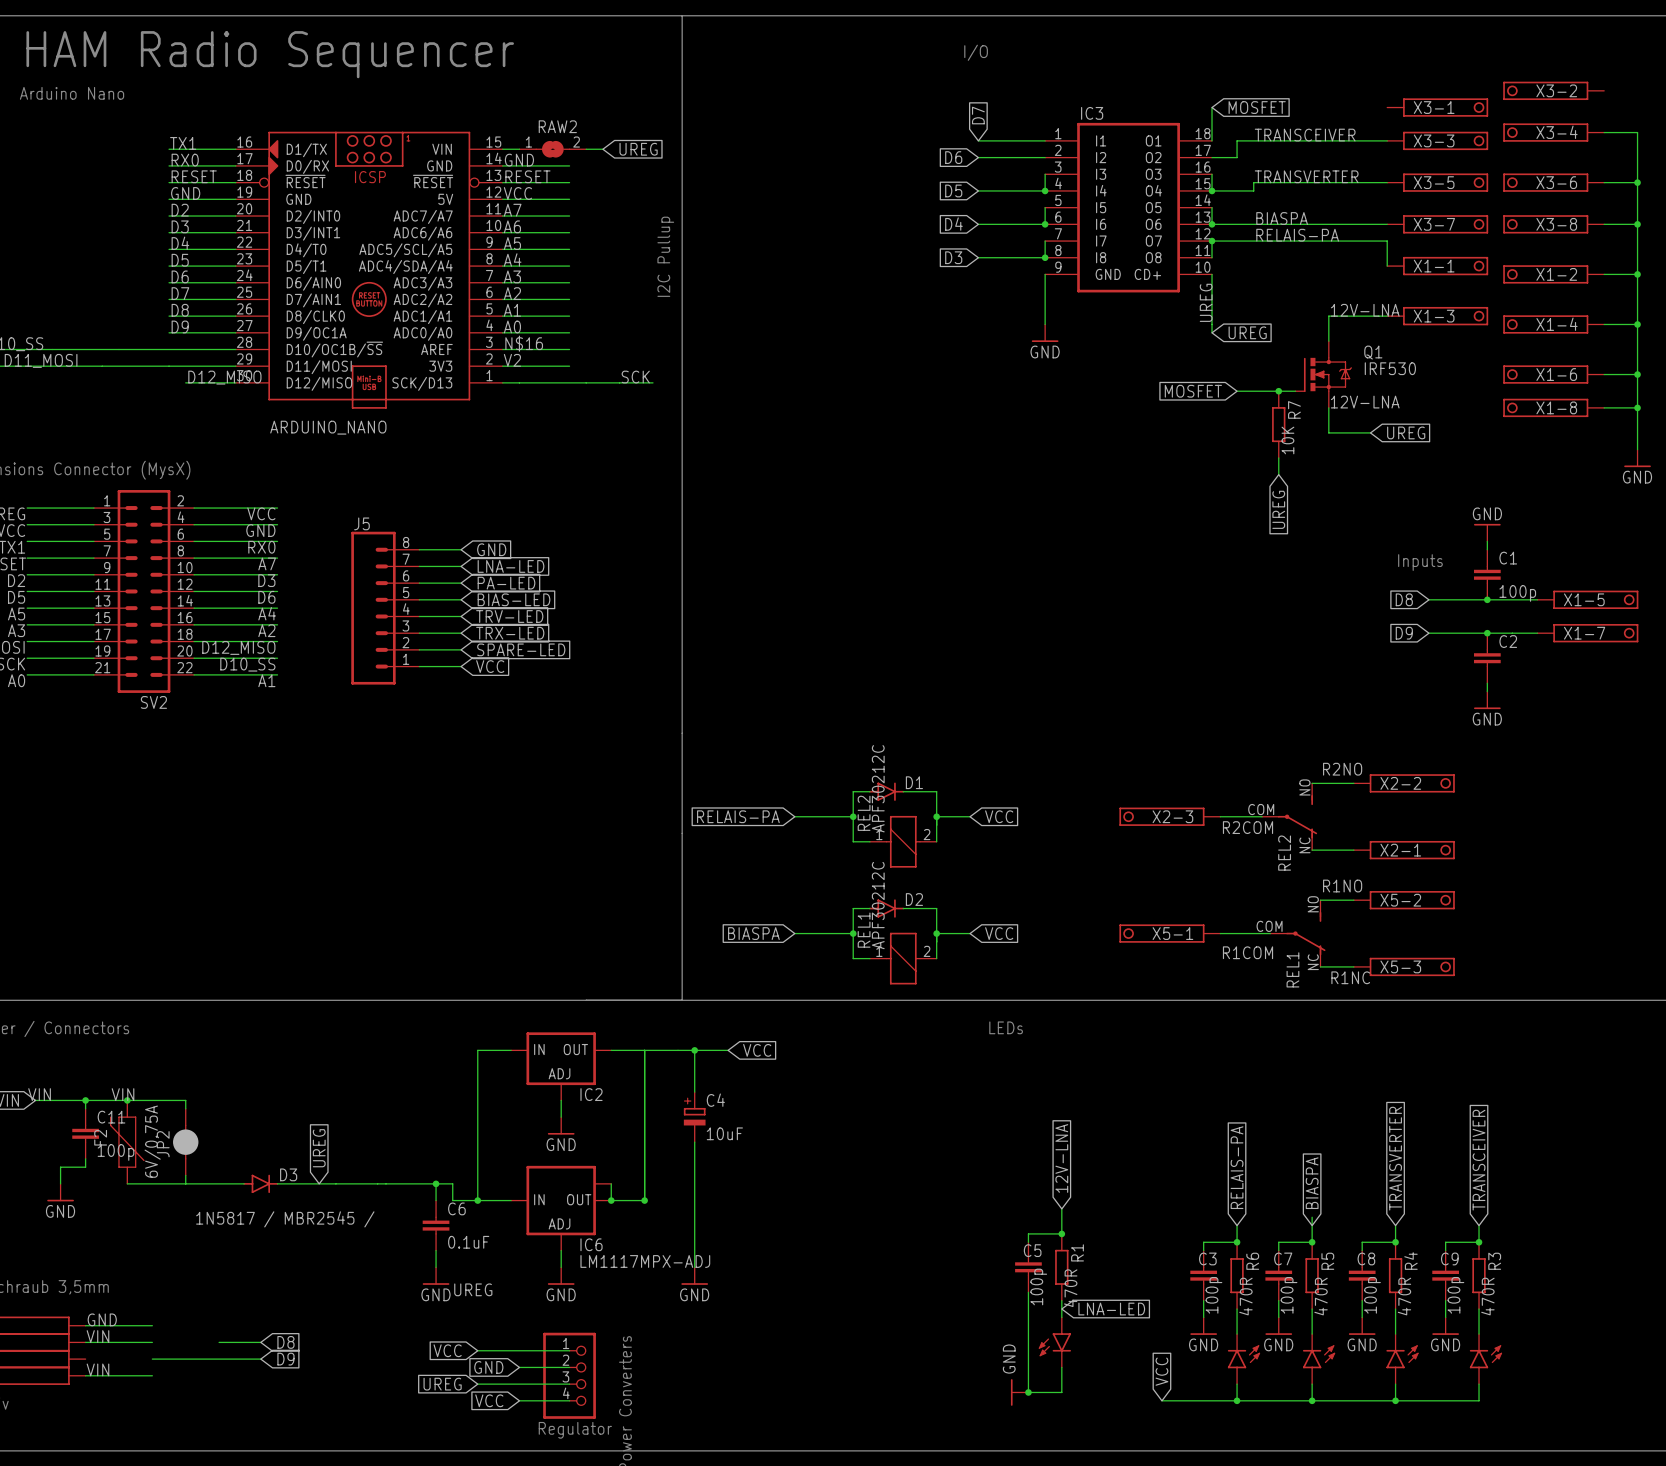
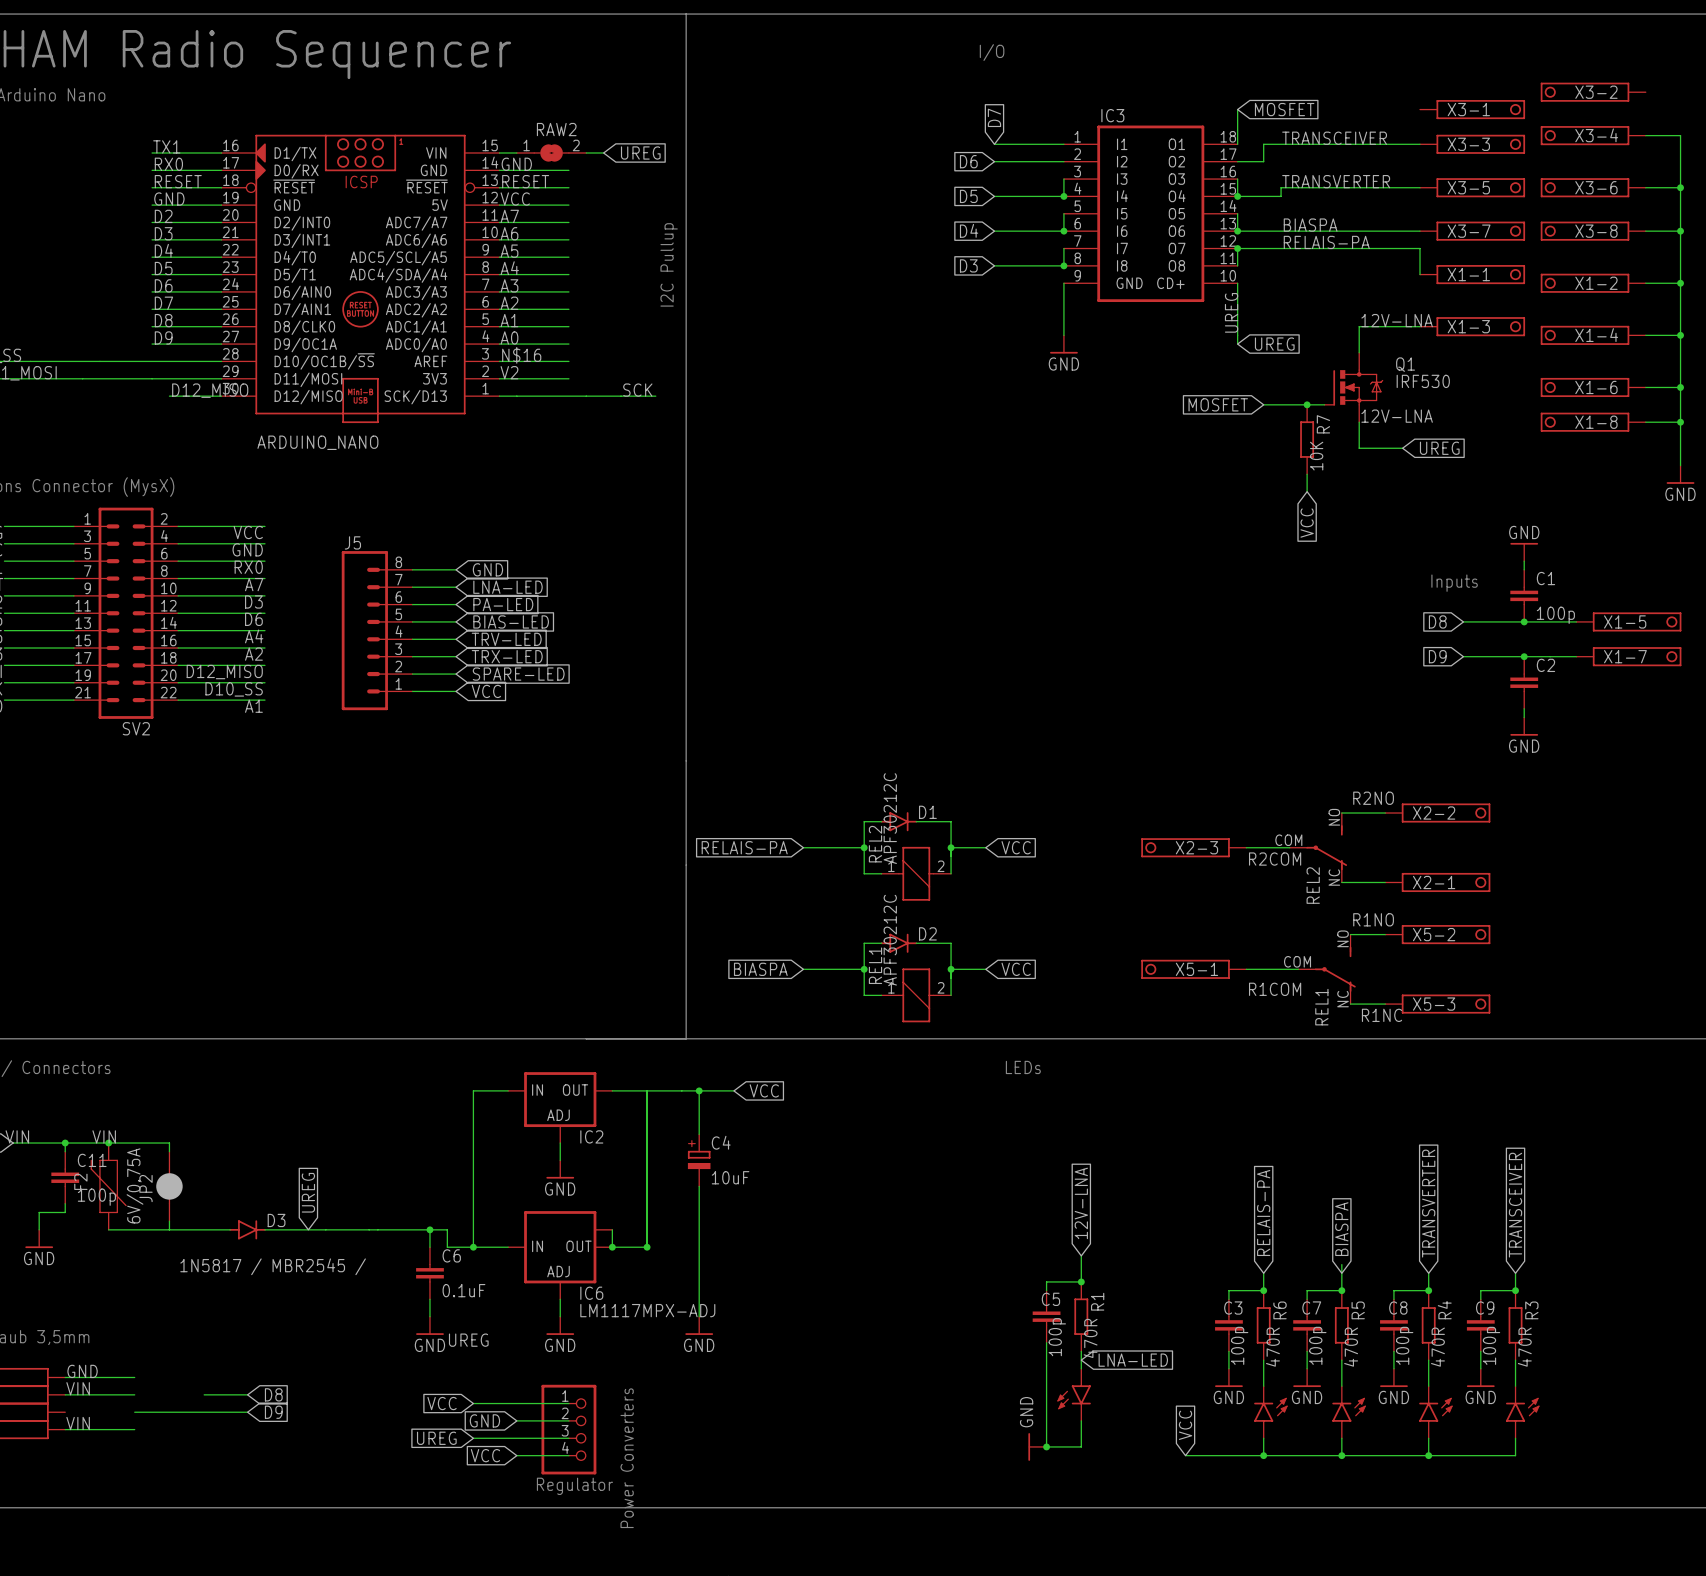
global label: UREG (1278, 509) -> VCC (1307, 523)

